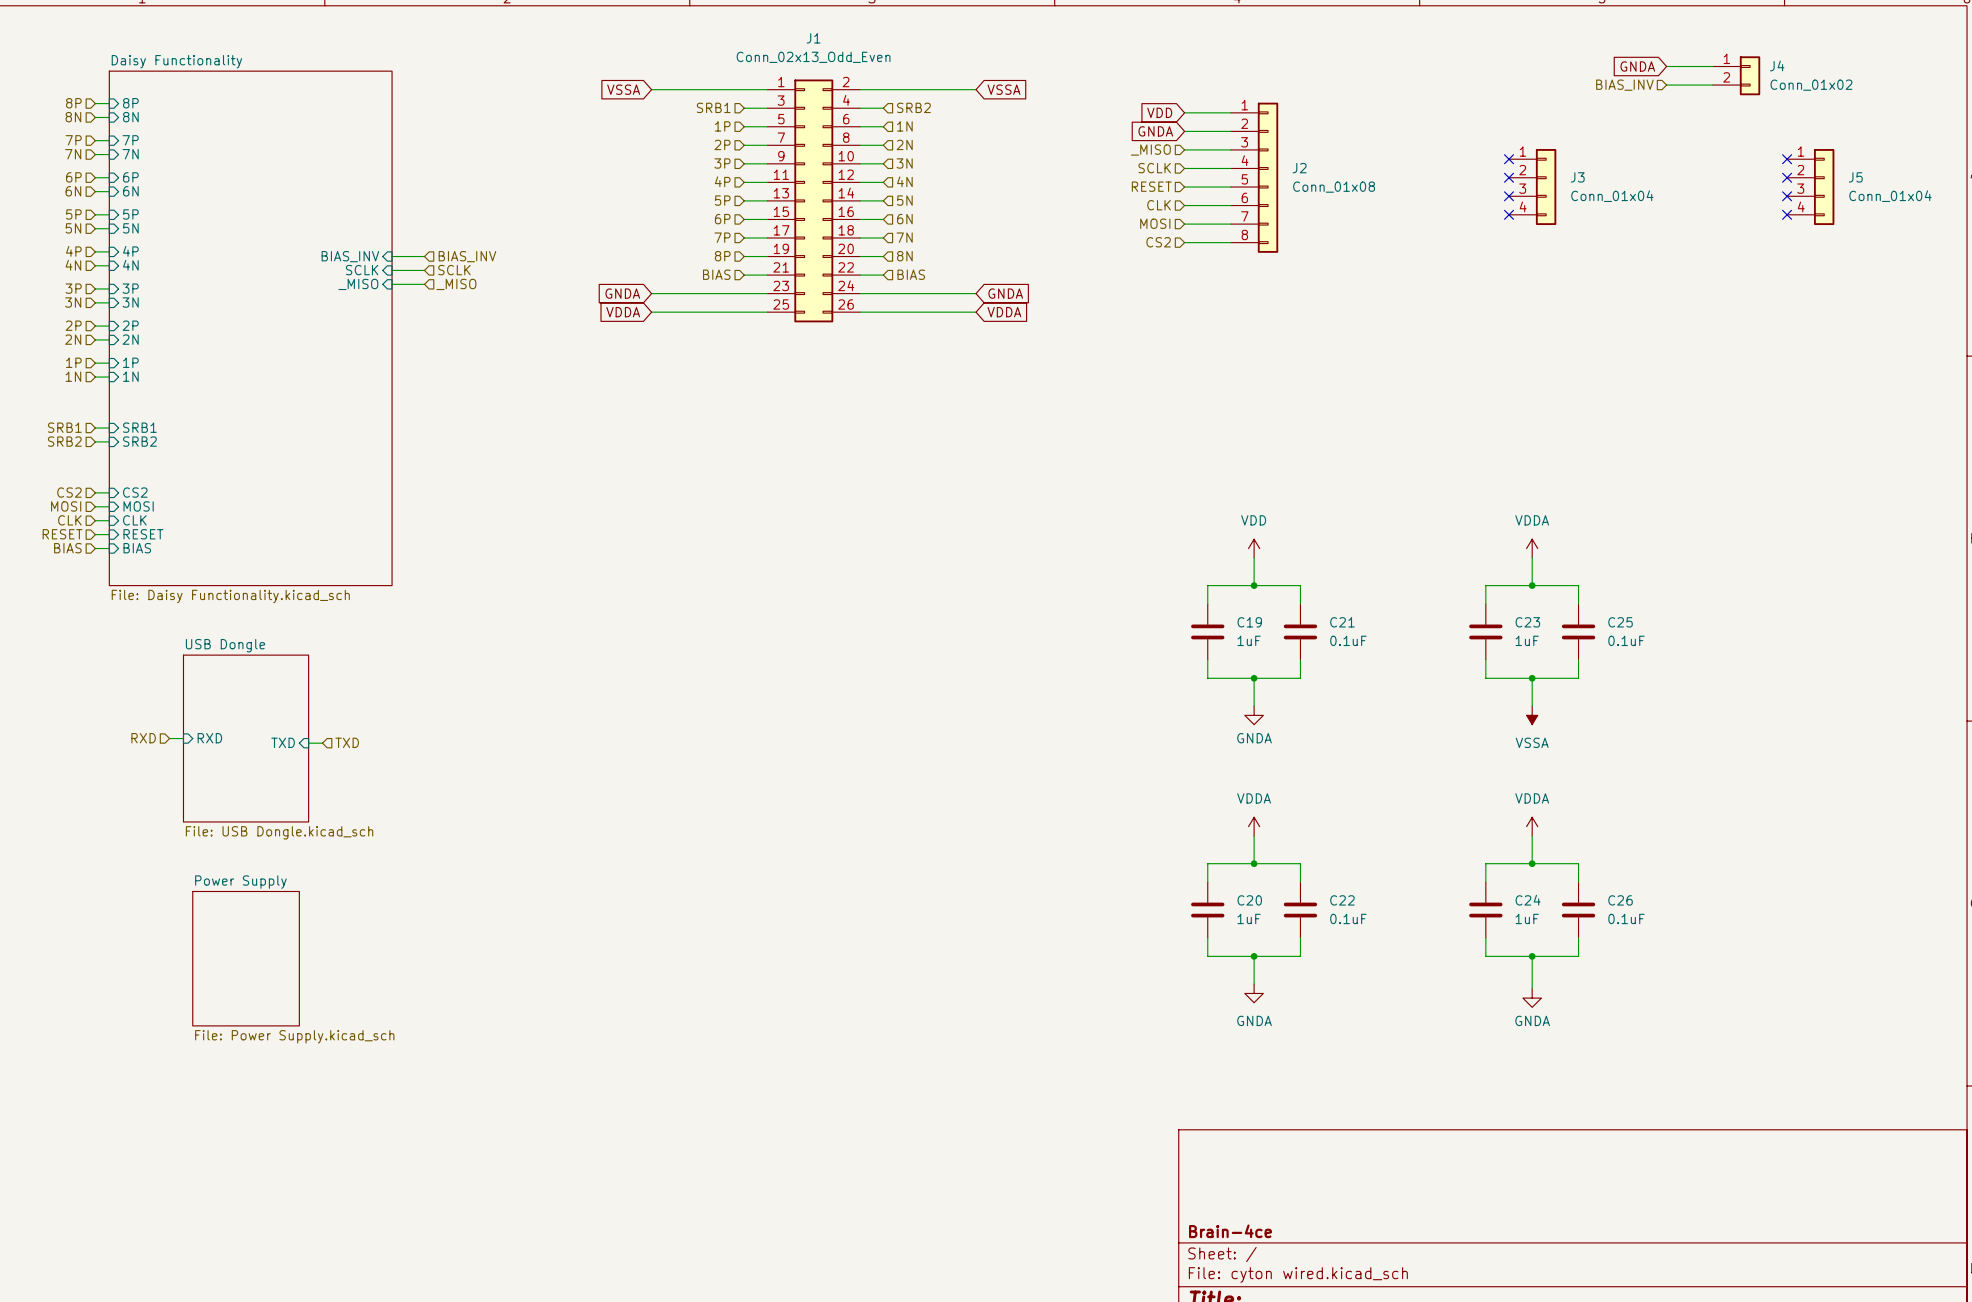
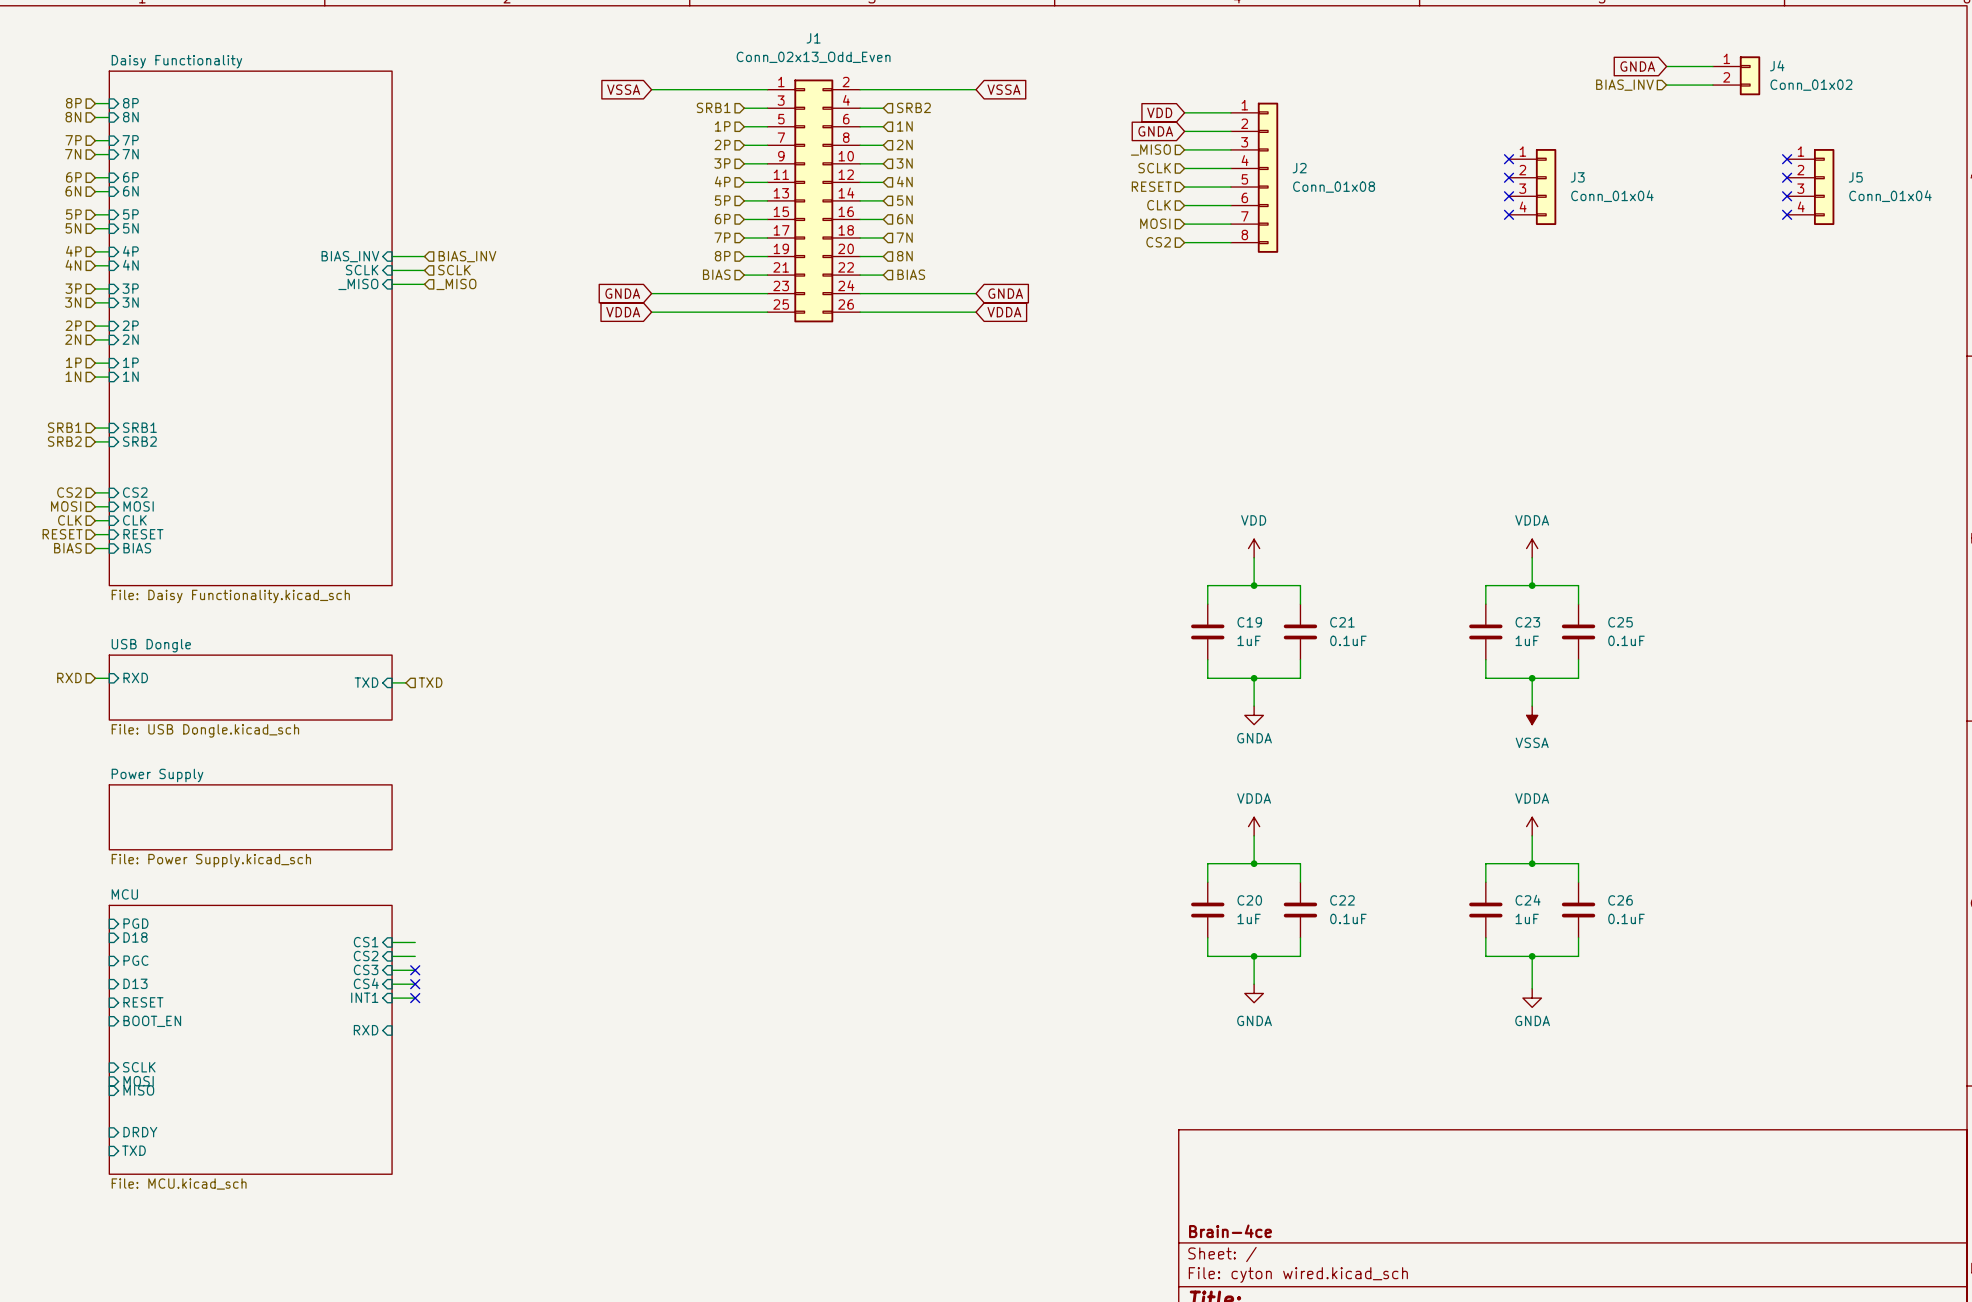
sheet USB Dongle: none -> File: USB Dongle.kicad_sch (250, 687)
hierarchical label position: RXD (143, 738) -> RXD (69, 677)
wire: (169, 738) (183, 738) -> (95, 678) (109, 678)
sheet pin position: RXD (209, 738) -> RXD (135, 677)
sheet USB Dongle: File: USB Dongle.kicad_sch (246, 738) -> none
sheet pin position: TXD (283, 742) -> TXD (366, 682)
hierarchical label position: TXD (347, 742) -> TXD (430, 682)
wire: (308, 743) (322, 743) -> (392, 682) (405, 682)
sheet Power Supply: none -> File: Power Supply.kicad_sch (250, 817)
sheet pin: none -> PGD (135, 923)
sheet pin: none -> D18 (135, 937)
sheet pin: none -> CS1 (366, 942)
wire: none -> (392, 942) (415, 942)
sheet pin: none -> CS2 (366, 956)
wire: none -> (392, 956) (415, 956)
sheet Power Supply: File: Power Supply.kicad_sch (246, 958) -> none
sheet pin: none -> PGC (135, 960)
sheet pin: none -> CS3 (366, 969)
wire: none -> (392, 970) (415, 970)
no-connect mark: none -> (415, 970)
sheet pin: none -> D13 (135, 983)
sheet pin: none -> CS4 (366, 983)
wire: none -> (392, 984) (415, 984)
no-connect mark: none -> (415, 984)
sheet pin: none -> INT1 (364, 997)
wire: none -> (392, 998) (415, 998)
no-connect mark: none -> (415, 998)
sheet pin: none -> RESET (143, 1002)
sheet pin: none -> BOOT_EN (152, 1021)
sheet pin: none -> RXD (366, 1030)
sheet MCU: none -> File: MCU.kicad_sch (250, 1039)
sheet pin: none -> SCLK (139, 1067)
sheet pin: none -> MOSI (138, 1081)
sheet pin: none -> MISO (138, 1090)
sheet pin: none -> DRDY (140, 1132)
sheet pin: none -> TXD (133, 1150)

